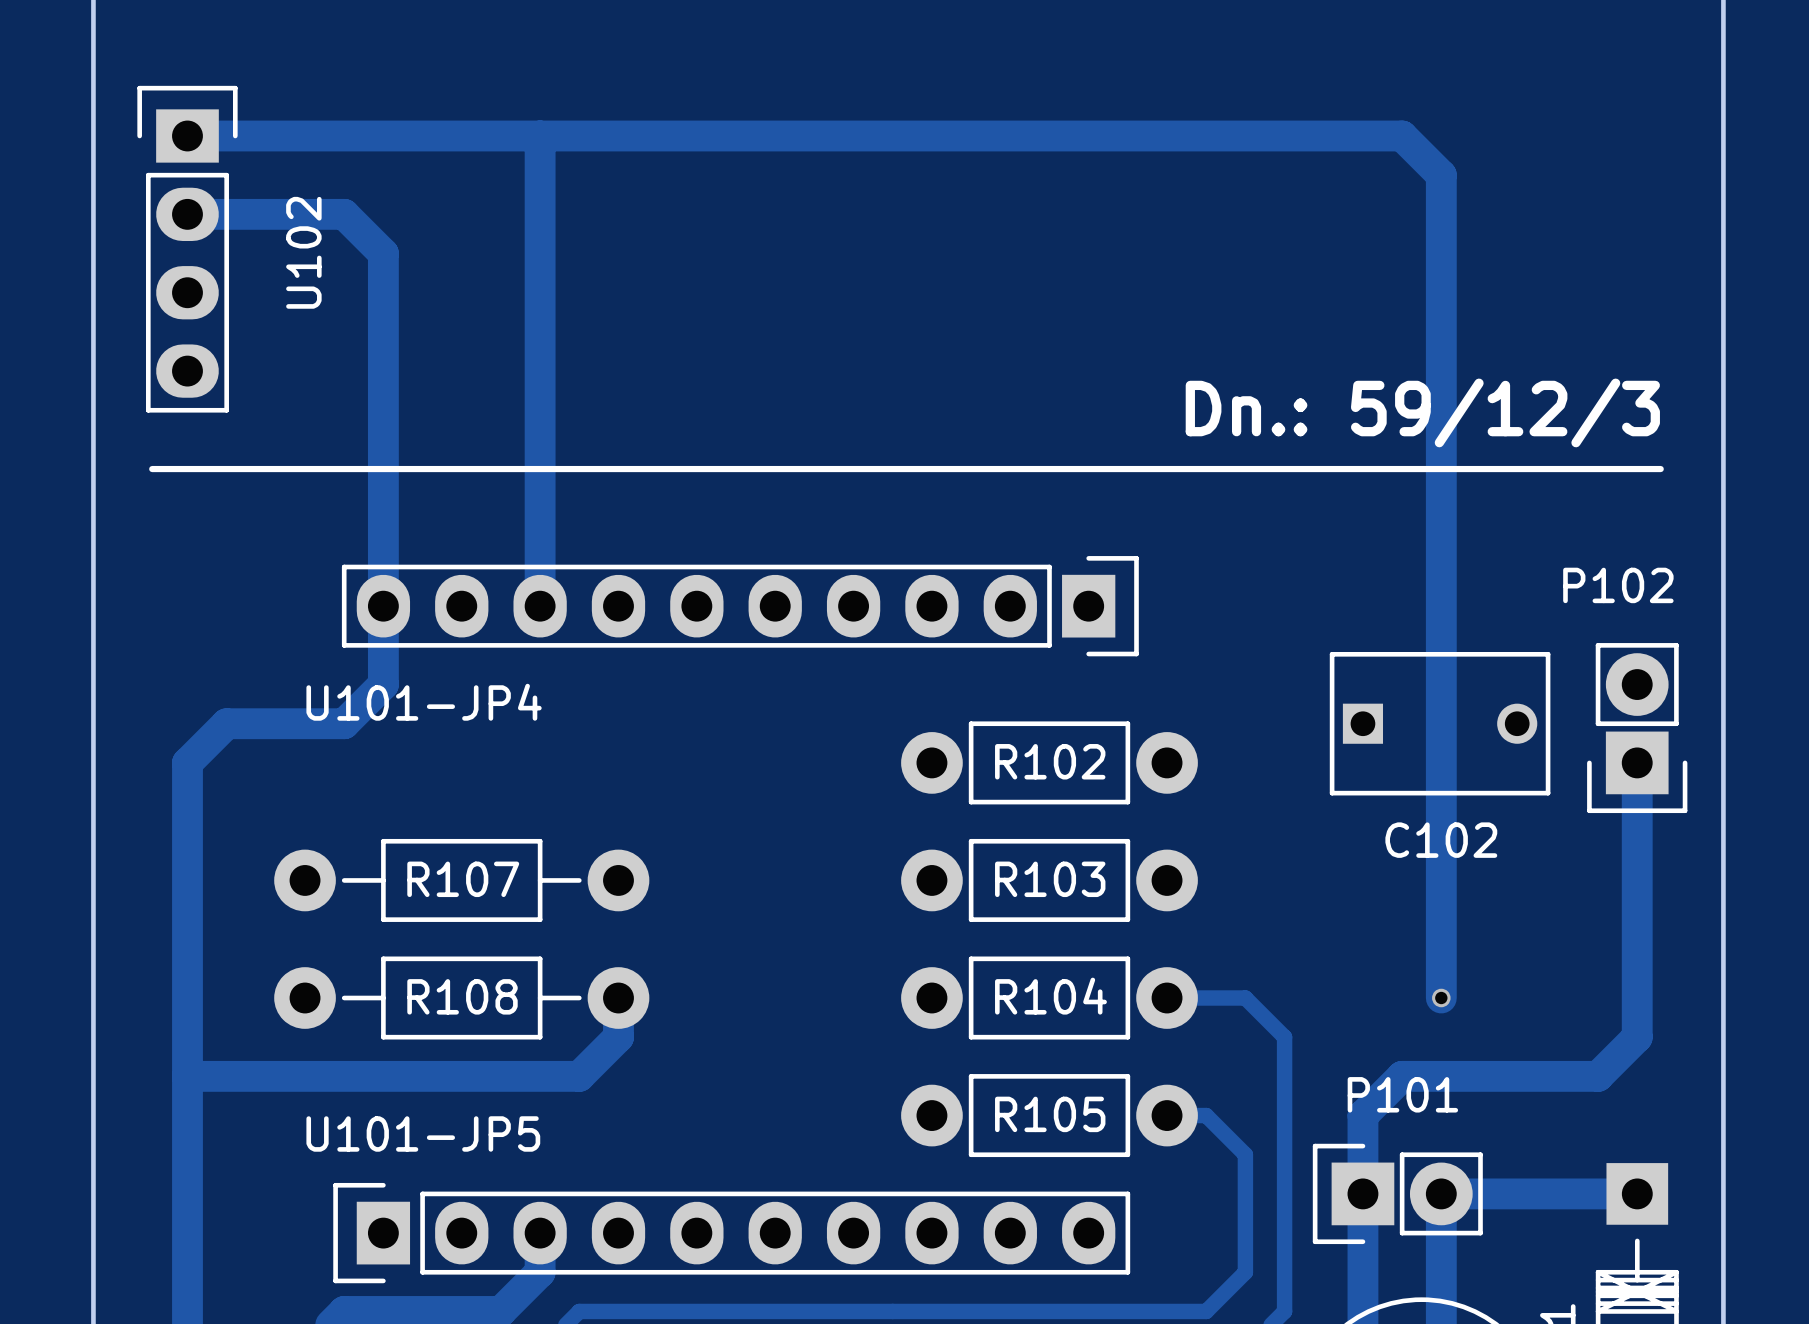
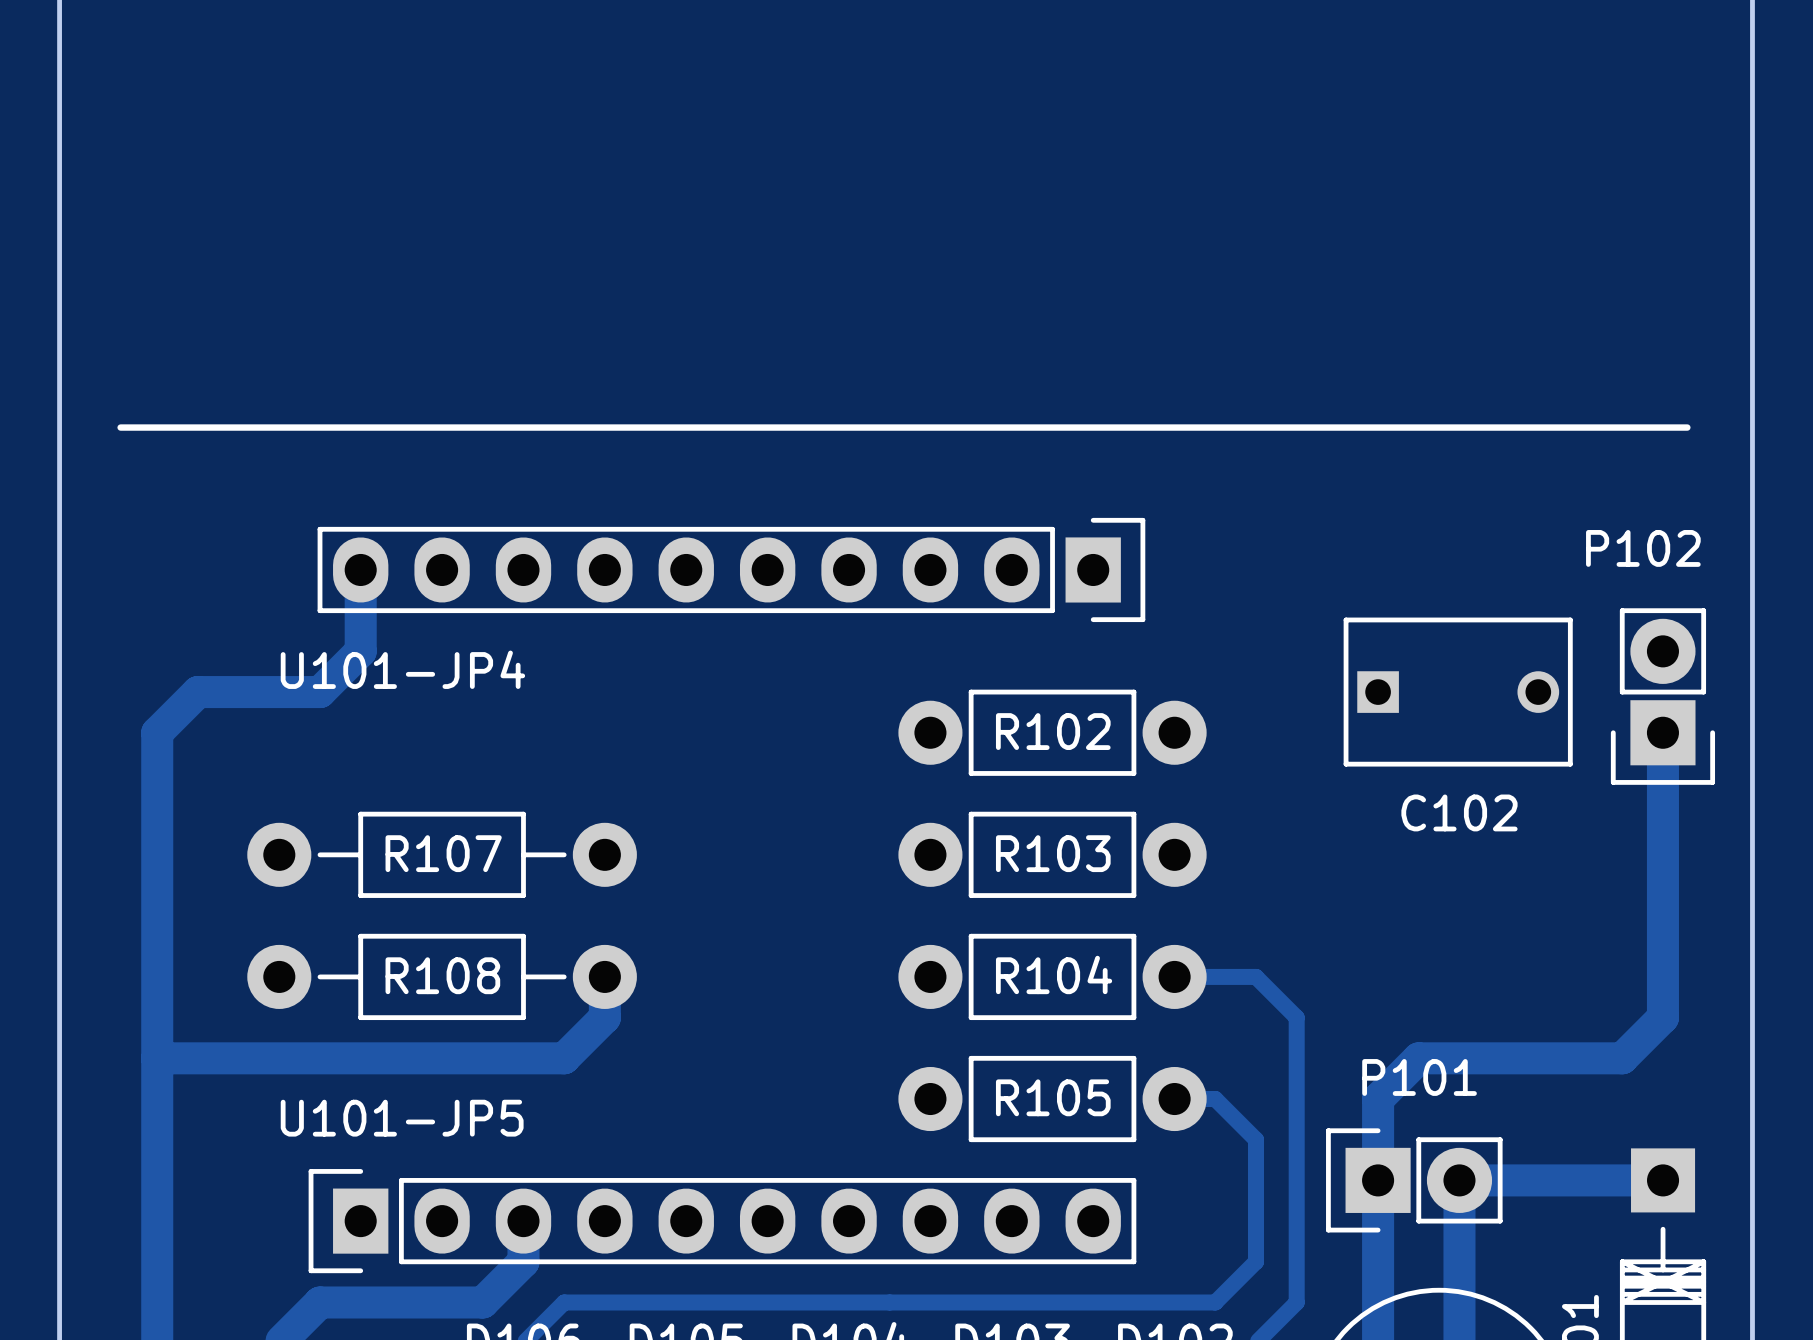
track: (187, 135) (1402, 135) (1441, 175) (1441, 998) -> none
track: (540, 135) (540, 606) -> none
track: (187, 214) (344, 214) (383, 253) (383, 606) -> none
U102: (187, 249) -> none
text: Dn.: 59/12/3 (1422, 412) -> none
via: (1441, 998) -> none

